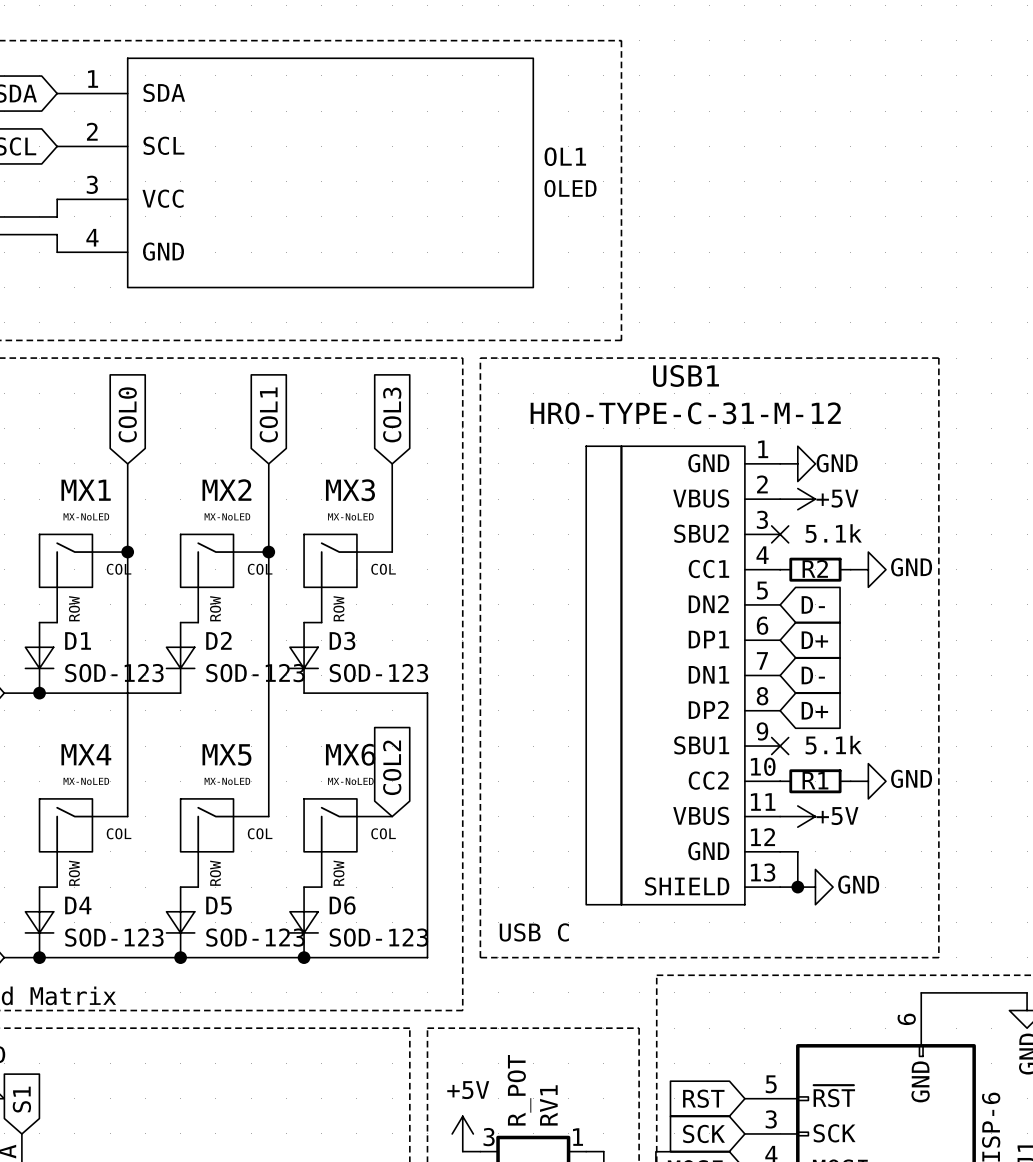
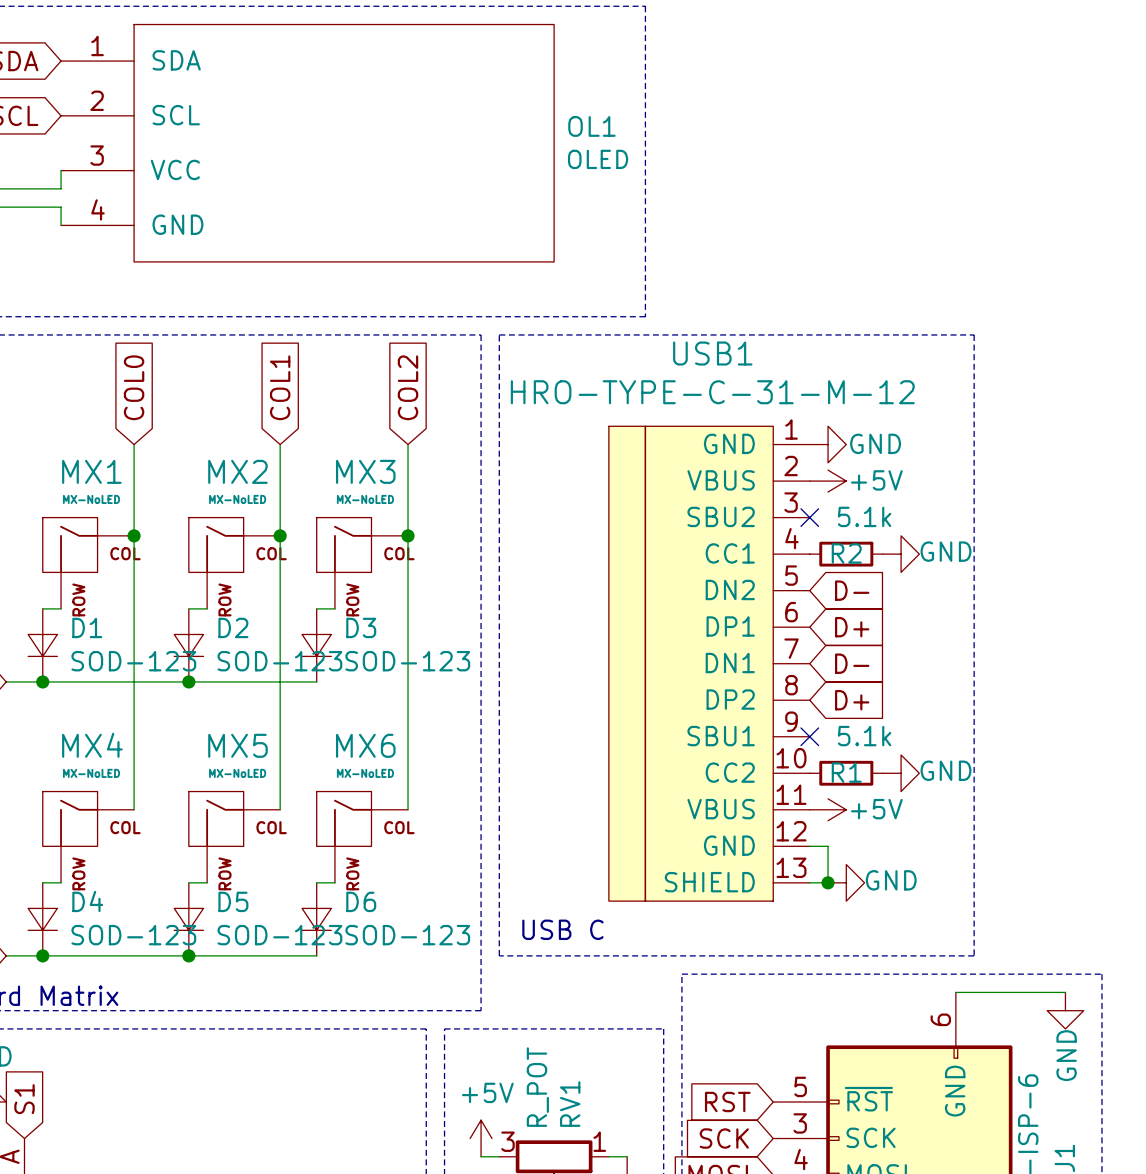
global label: COL3 (392, 414) -> COL2 (408, 387)
wire: none -> (408, 535) (408, 809)
junction: none -> (408, 535)
junction: none -> (188, 681)
wire: (304, 693) (427, 693) (427, 957) (304, 957) -> (316, 681) (188, 681)
global label: COL2 (392, 767) -> none
junction: (304, 957) -> none

